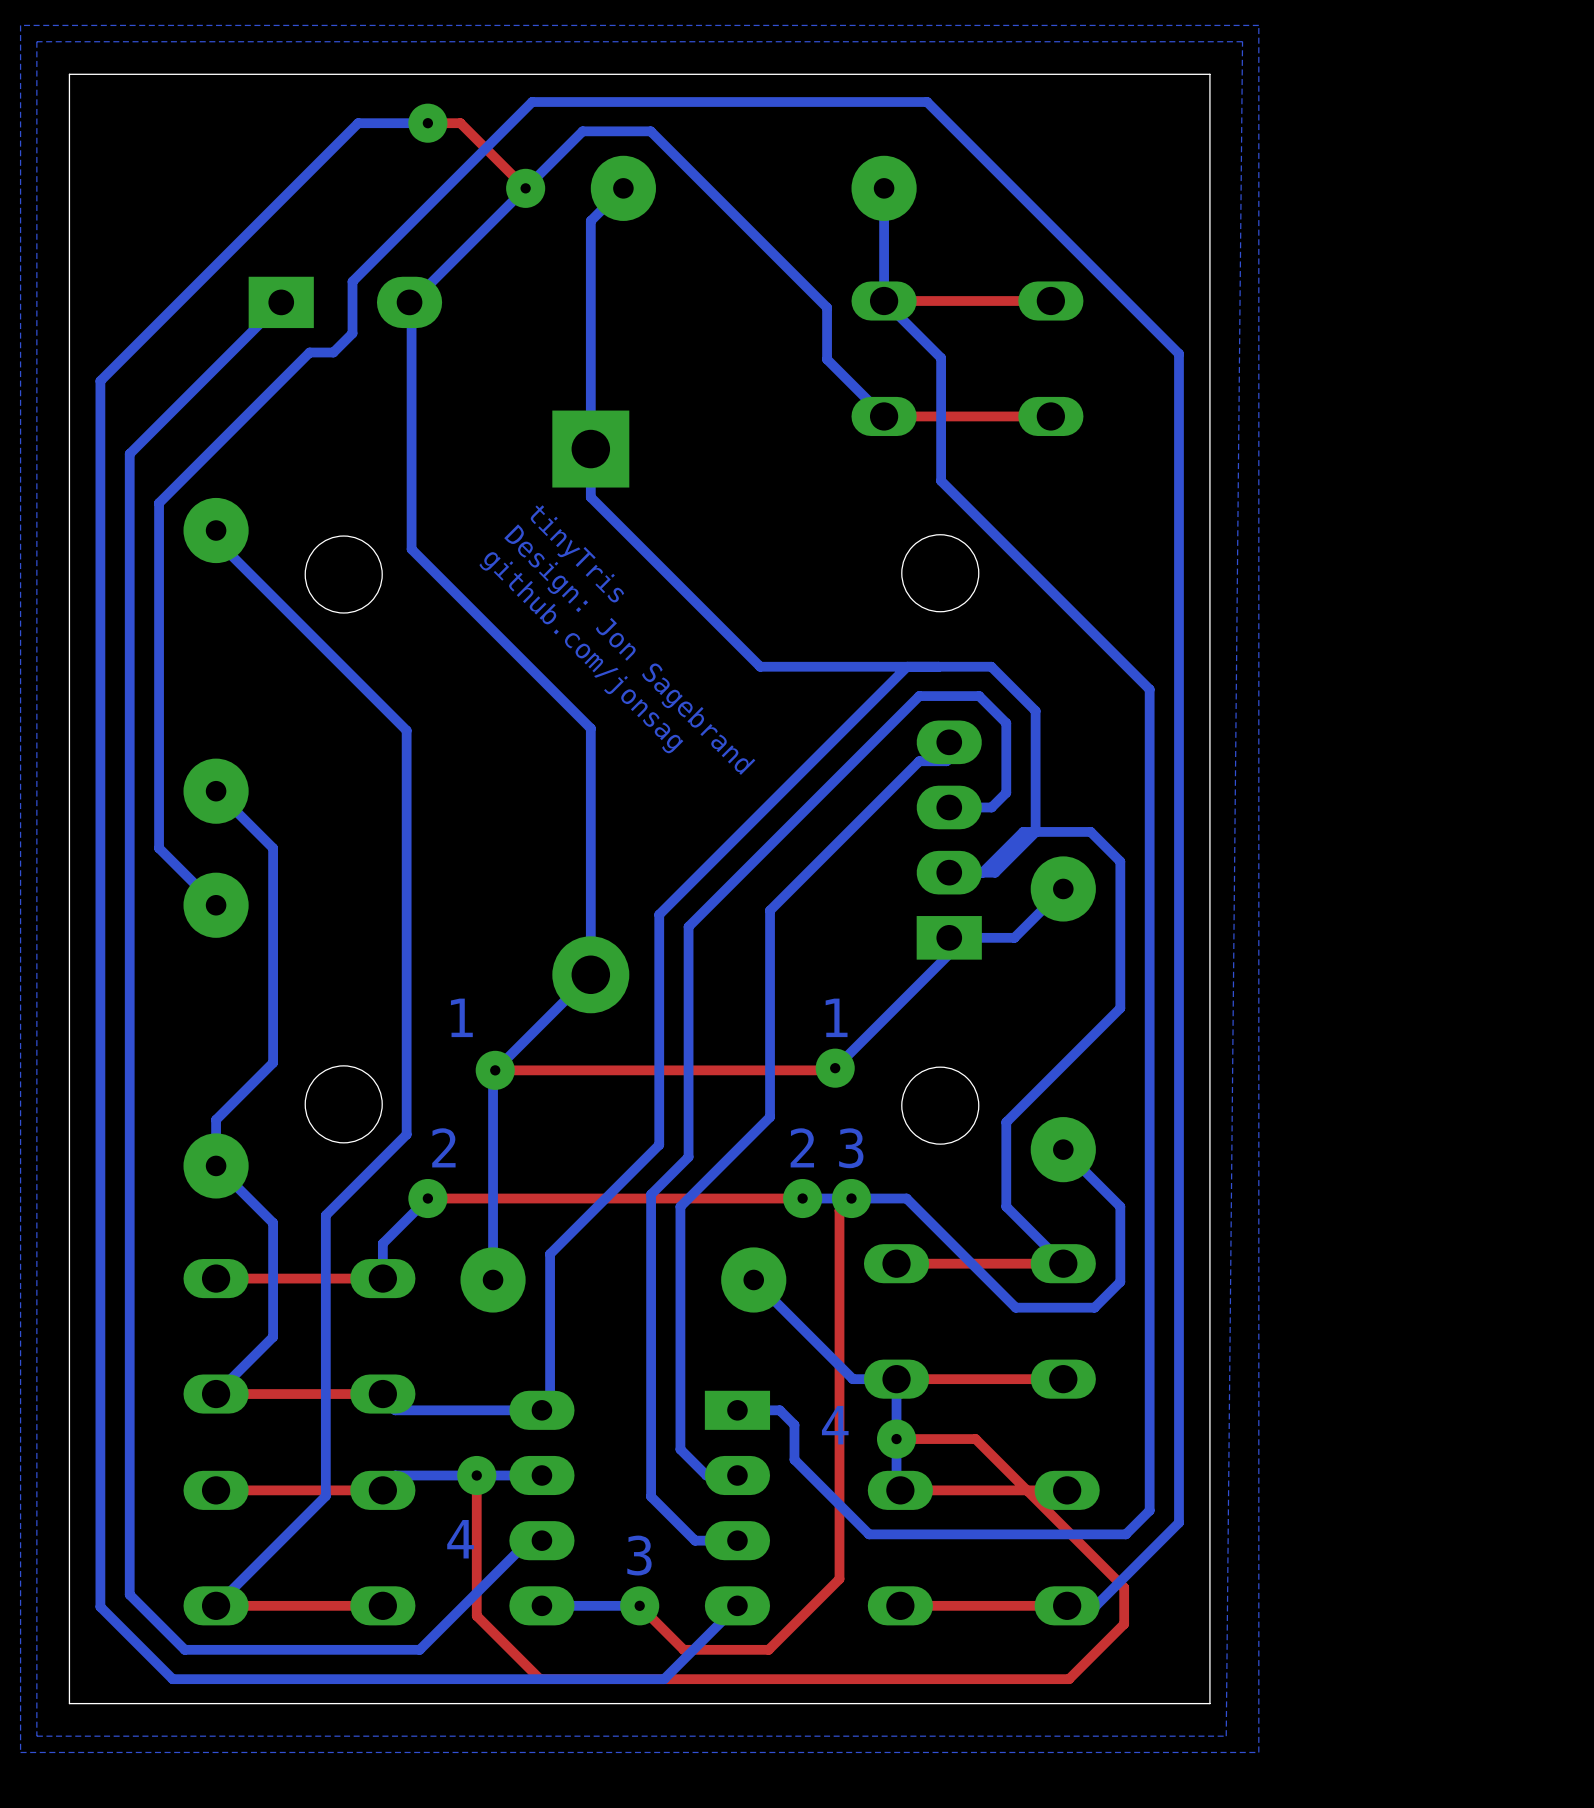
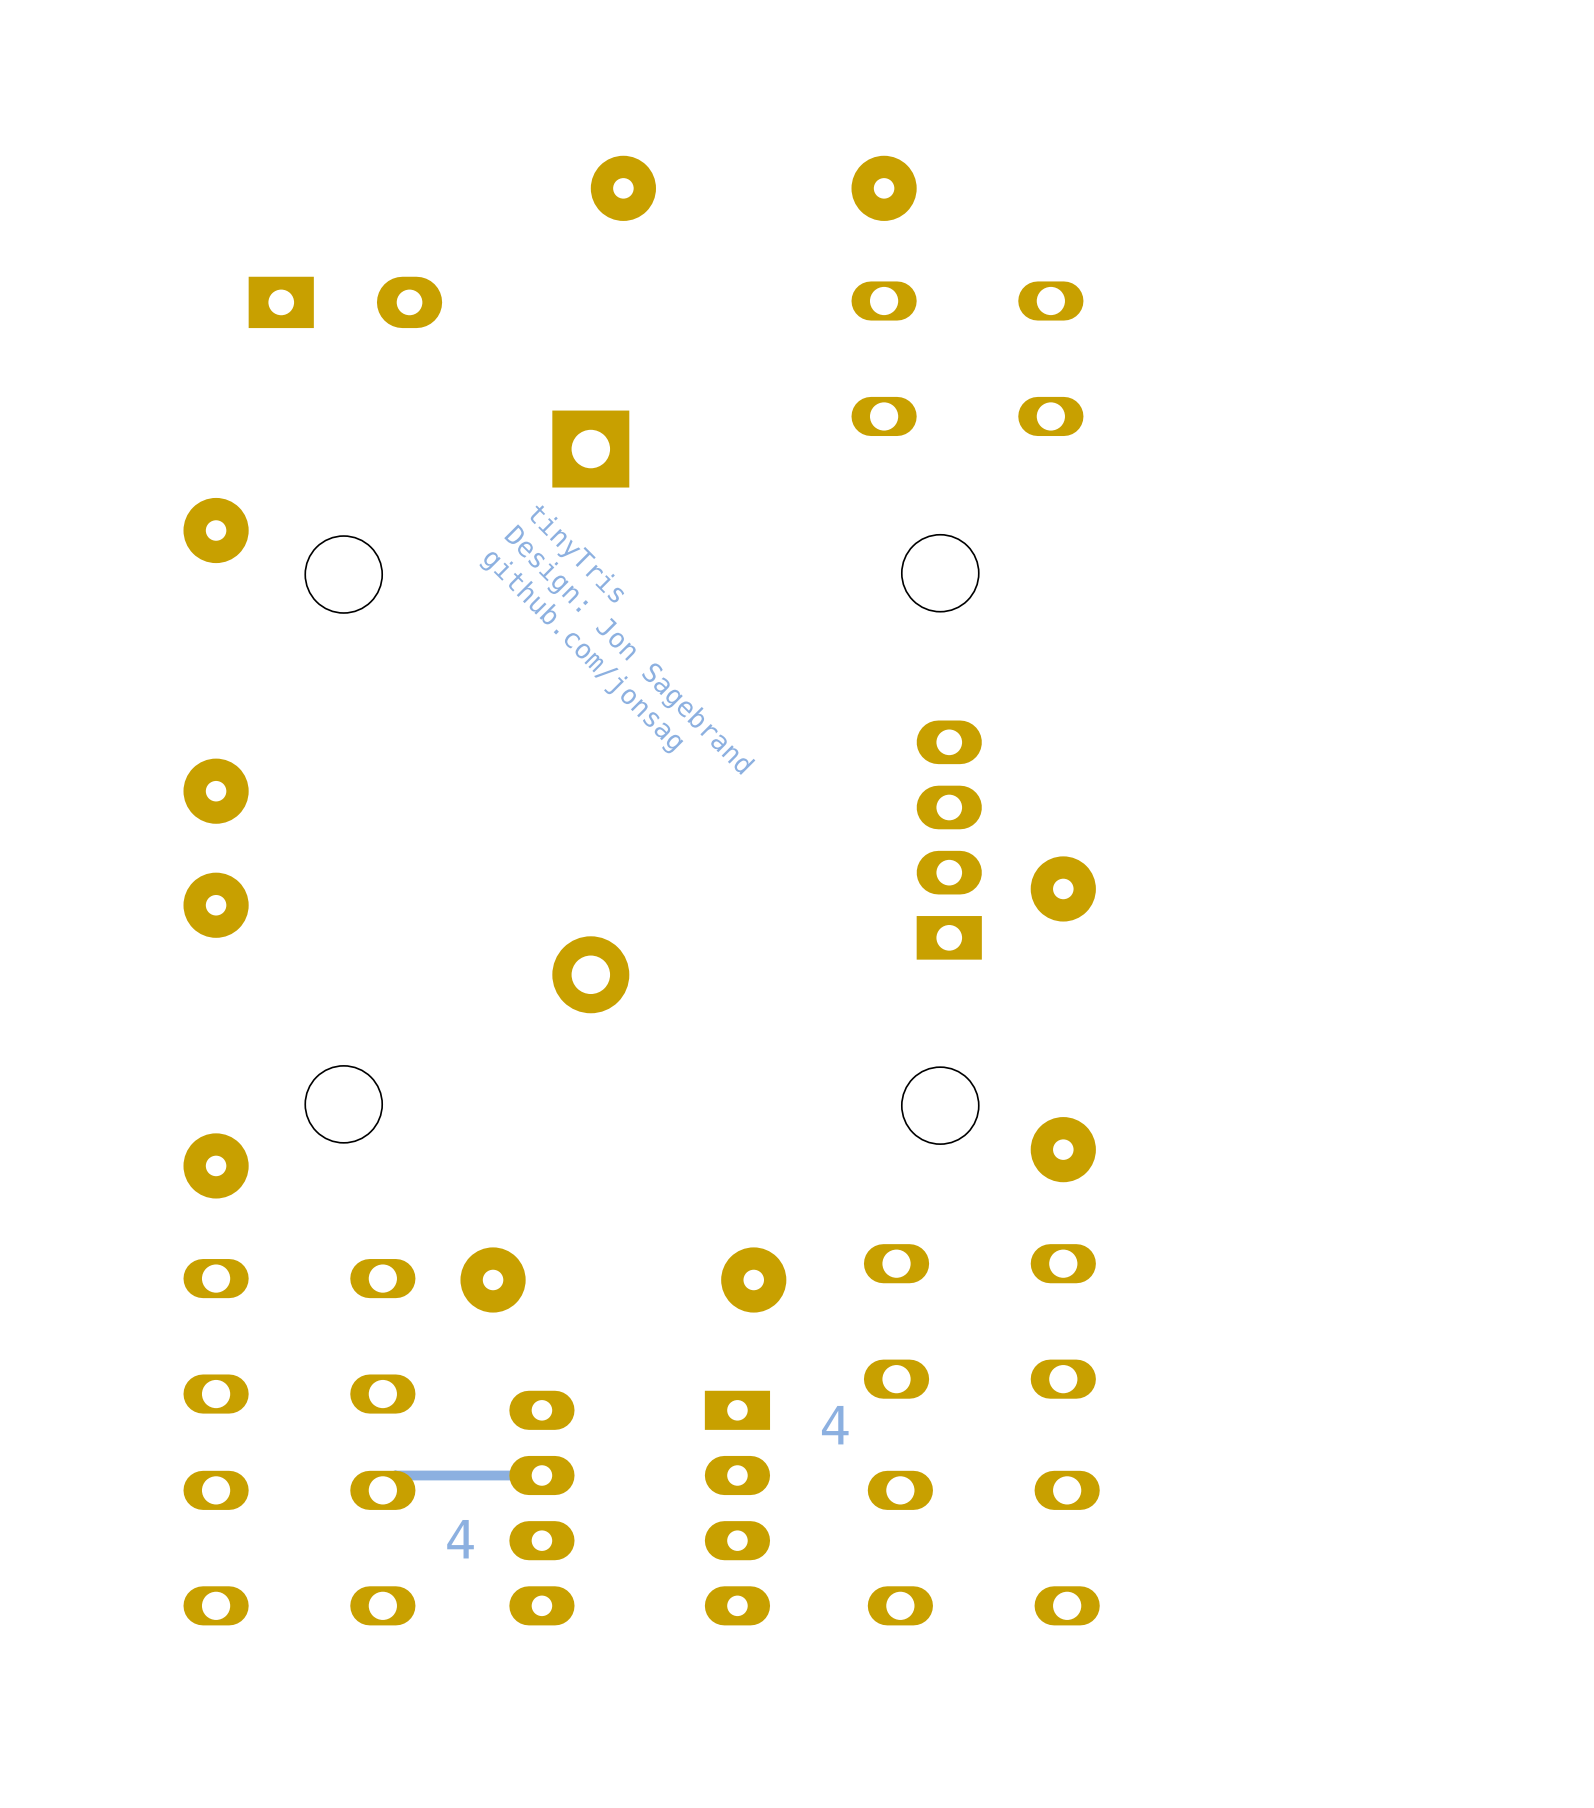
bottom zone outline: (1258, 25) (1258, 1752) (20, 1752) (20, 25) (1258, 25) -> none
bottom zone outline: (1242, 41) (1226, 1736) (36, 1736) (36, 41) (1242, 41) -> none
board edge: (1209, 74) (69, 74) (69, 1703) (1209, 1703) (1209, 74) -> none
bottom track: (427, 123) (358, 123) (100, 381) (100, 1606) (172, 1679) (664, 1679) (737, 1605) -> none
top track: (427, 123) (460, 123) (525, 188) -> none
via: (427, 123) -> none
via: (525, 188) -> none
bottom track: (623, 188) (590, 220) (590, 497) (760, 666) (991, 666) (1035, 711) (1035, 832) (995, 872) (949, 872) -> none
bottom track: (884, 188) (884, 301) (941, 358) (941, 480) (1149, 689) (1149, 1510) (1125, 1534) (869, 1534) (794, 1459) (794, 1424) (779, 1410) (737, 1410) -> none
top track: (1050, 301) (884, 302) -> none
bottom track: (281, 302) (129, 453) (129, 1594) (184, 1649) (419, 1649) (528, 1540) (541, 1540) -> none
bottom track: (884, 416) (827, 359) (827, 307) (650, 131) (582, 131) (411, 302) (411, 549) (590, 728) (590, 974) (493, 1072) (493, 1279) -> none
top track: (1047, 416) (884, 416) -> none
bottom track: (216, 530) (216, 540) (406, 730) (406, 1134) (325, 1215) (325, 1496) (216, 1605) -> none
bottom track: (907, 666) (659, 914) (659, 1144) (550, 1254) (550, 1402) (541, 1410) (395, 1410) (379, 1394) -> none
bottom track: (949, 742) (949, 758) (946, 761) (919, 761) (770, 910) (770, 1117) (680, 1206) (680, 1449) (706, 1475) (737, 1475) -> none
bottom track: (216, 791) (273, 848) (273, 1062) (216, 1119) (216, 1165) (273, 1222) (273, 1337) (216, 1394) -> none
bottom track: (949, 807) (991, 807) (1006, 792) (1006, 723) (979, 696) (919, 696) (688, 926) (688, 1157) (651, 1194) (651, 1496) (695, 1540) (737, 1540) -> none
bottom track: (982, 872) (1023, 831) (1090, 831) (1120, 861) (1120, 1008) (1006, 1122) (1006, 1206) (1063, 1263) -> none
bottom track: (1063, 888) (1014, 937) (949, 937) (949, 954) (835, 1068) -> none
bottom track: (216, 905) (159, 848) (159, 503) (309, 352) (333, 352) (352, 333) (352, 281) (532, 102) (927, 102) (1178, 353) (1178, 1522) (1095, 1605) (1063, 1605) -> none
text: 1 (461, 1017) -> none
text: 1 (836, 1017) -> none
top track: (835, 1068) (833, 1070) (495, 1070) -> none
via: (835, 1068) -> none
via: (495, 1070) -> none
text: 2 (443, 1147) -> none
text: 2 (802, 1147) -> none
text: 3 (851, 1148) -> none
bottom track: (1063, 1149) (1120, 1206) (1120, 1281) (1094, 1307) (1015, 1307) (906, 1198) (802, 1198) -> none
bottom track: (427, 1198) (382, 1243) (382, 1278) -> none
via: (427, 1198) -> none
top track: (802, 1198) (427, 1198) -> none
via: (802, 1198) -> none
top track: (851, 1198) (839, 1210) (839, 1579) (768, 1649) (683, 1649) (639, 1605) -> none
via: (851, 1198) -> none
top track: (1063, 1263) (896, 1263) -> none
top track: (382, 1278) (216, 1279) -> none
bottom track: (753, 1279) (852, 1379) (896, 1379) (896, 1487) (900, 1491) -> none
top track: (1063, 1379) (915, 1379) (900, 1394) -> none
top track: (382, 1394) (216, 1394) -> none
top track: (896, 1439) (975, 1439) (1124, 1587) (1124, 1624) (1069, 1679) (540, 1679) (476, 1615) (476, 1475) -> none
via: (896, 1439) -> none
via: (476, 1475) -> none
top track: (382, 1490) (216, 1491) -> none
top track: (900, 1490) (1063, 1491) -> none
text: 3 (639, 1555) -> none
top track: (382, 1605) (216, 1605) -> none
bottom track: (639, 1605) (541, 1605) -> none
via: (639, 1605) -> none
top track: (1079, 1605) (900, 1605) -> none

